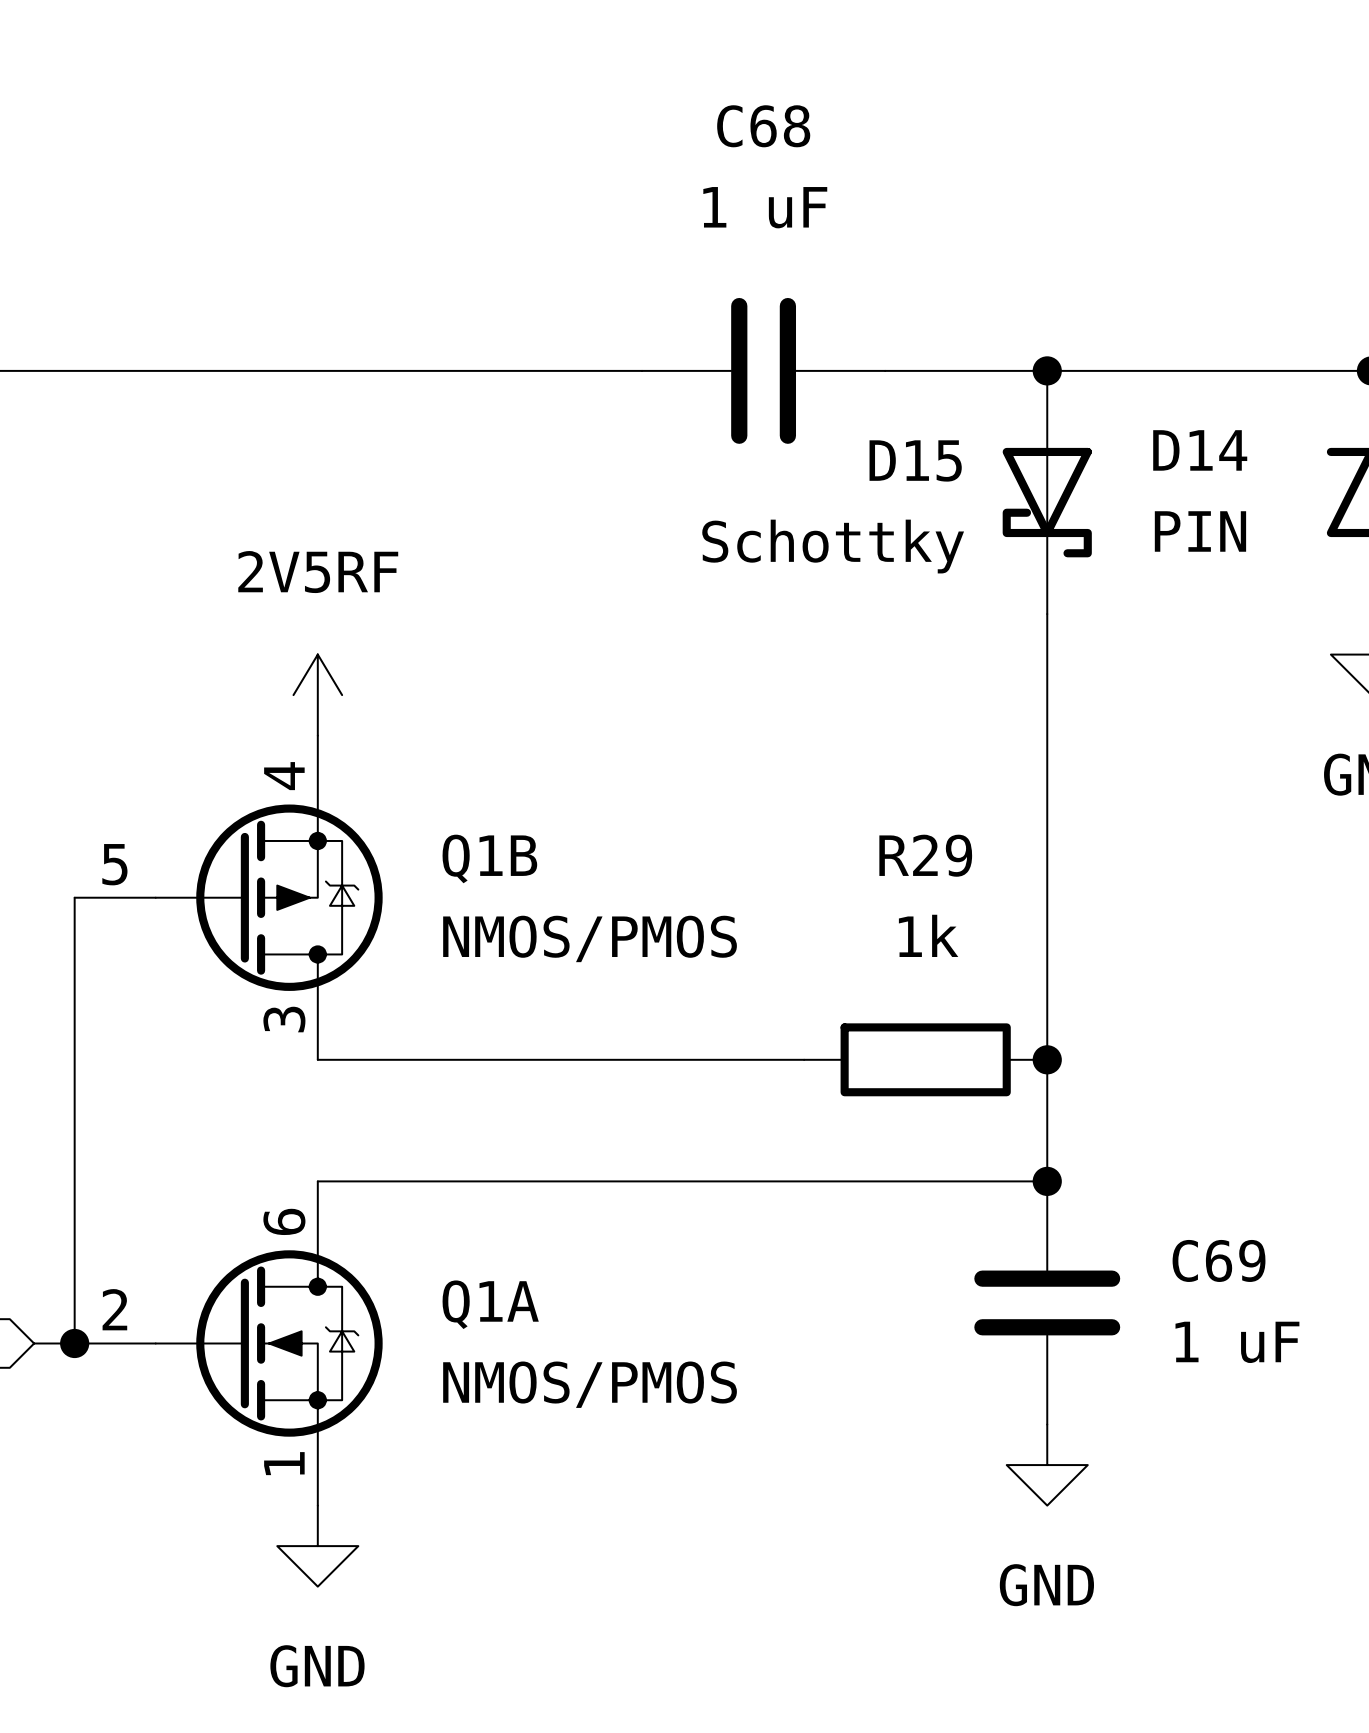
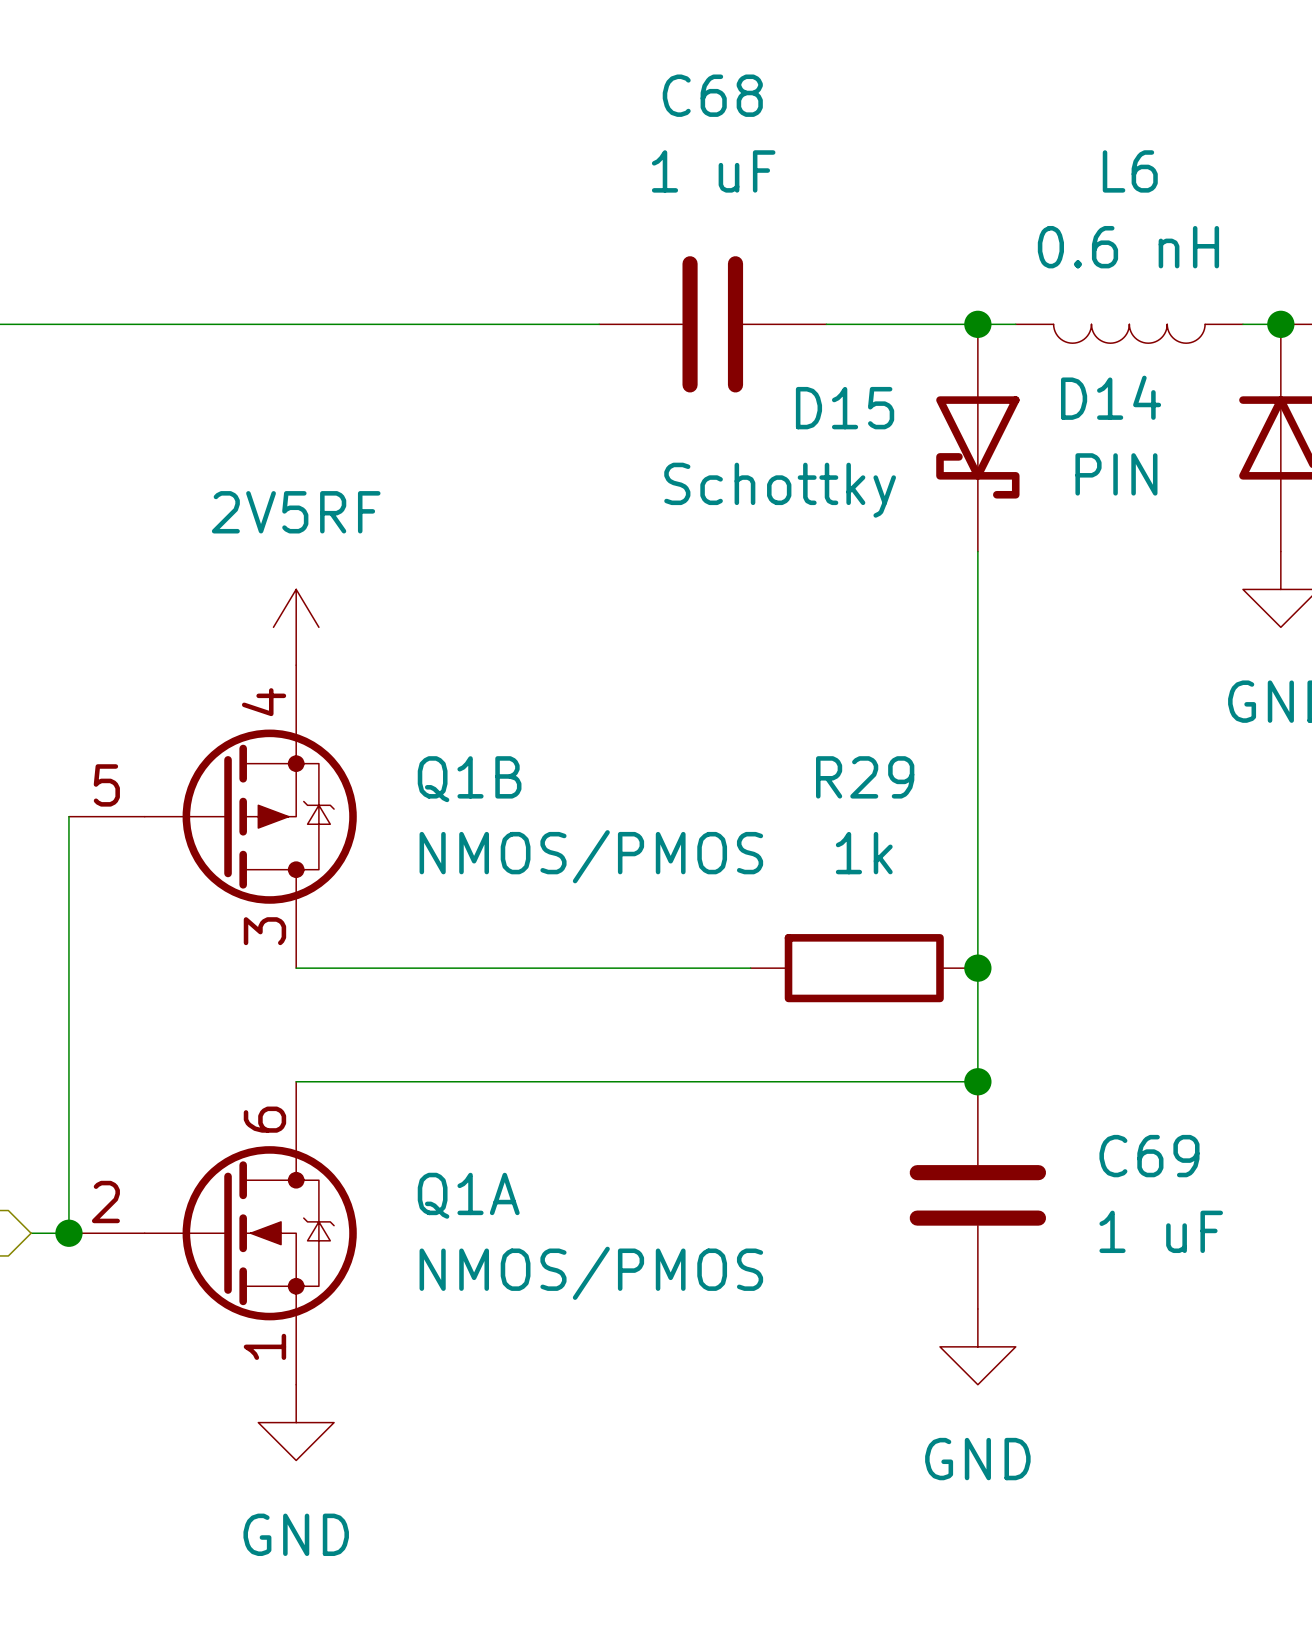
wire: (1087, 370) (1330, 370) -> none
L6: none -> 0.6 nH (1129, 333)

